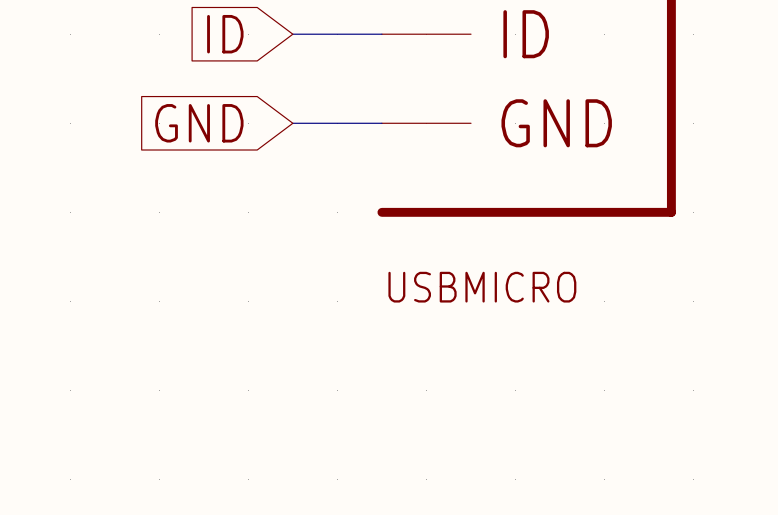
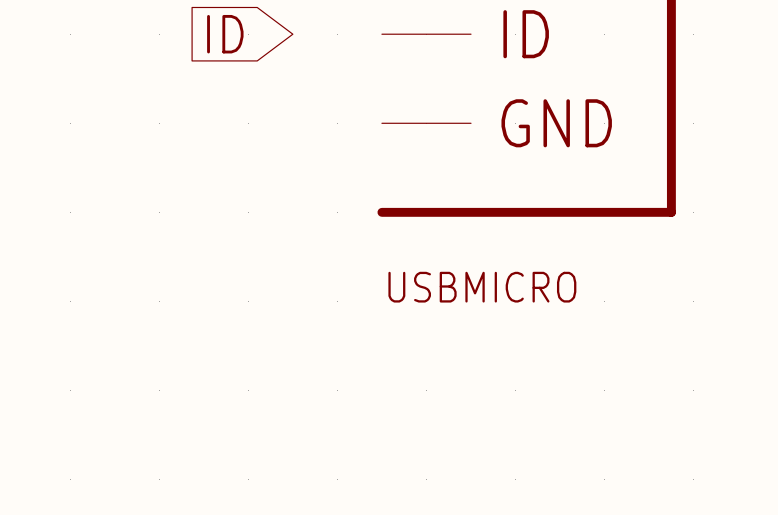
wire: (292, 34) (381, 34) -> none
global label: GND (199, 123) -> none
wire: (292, 123) (381, 123) -> none

